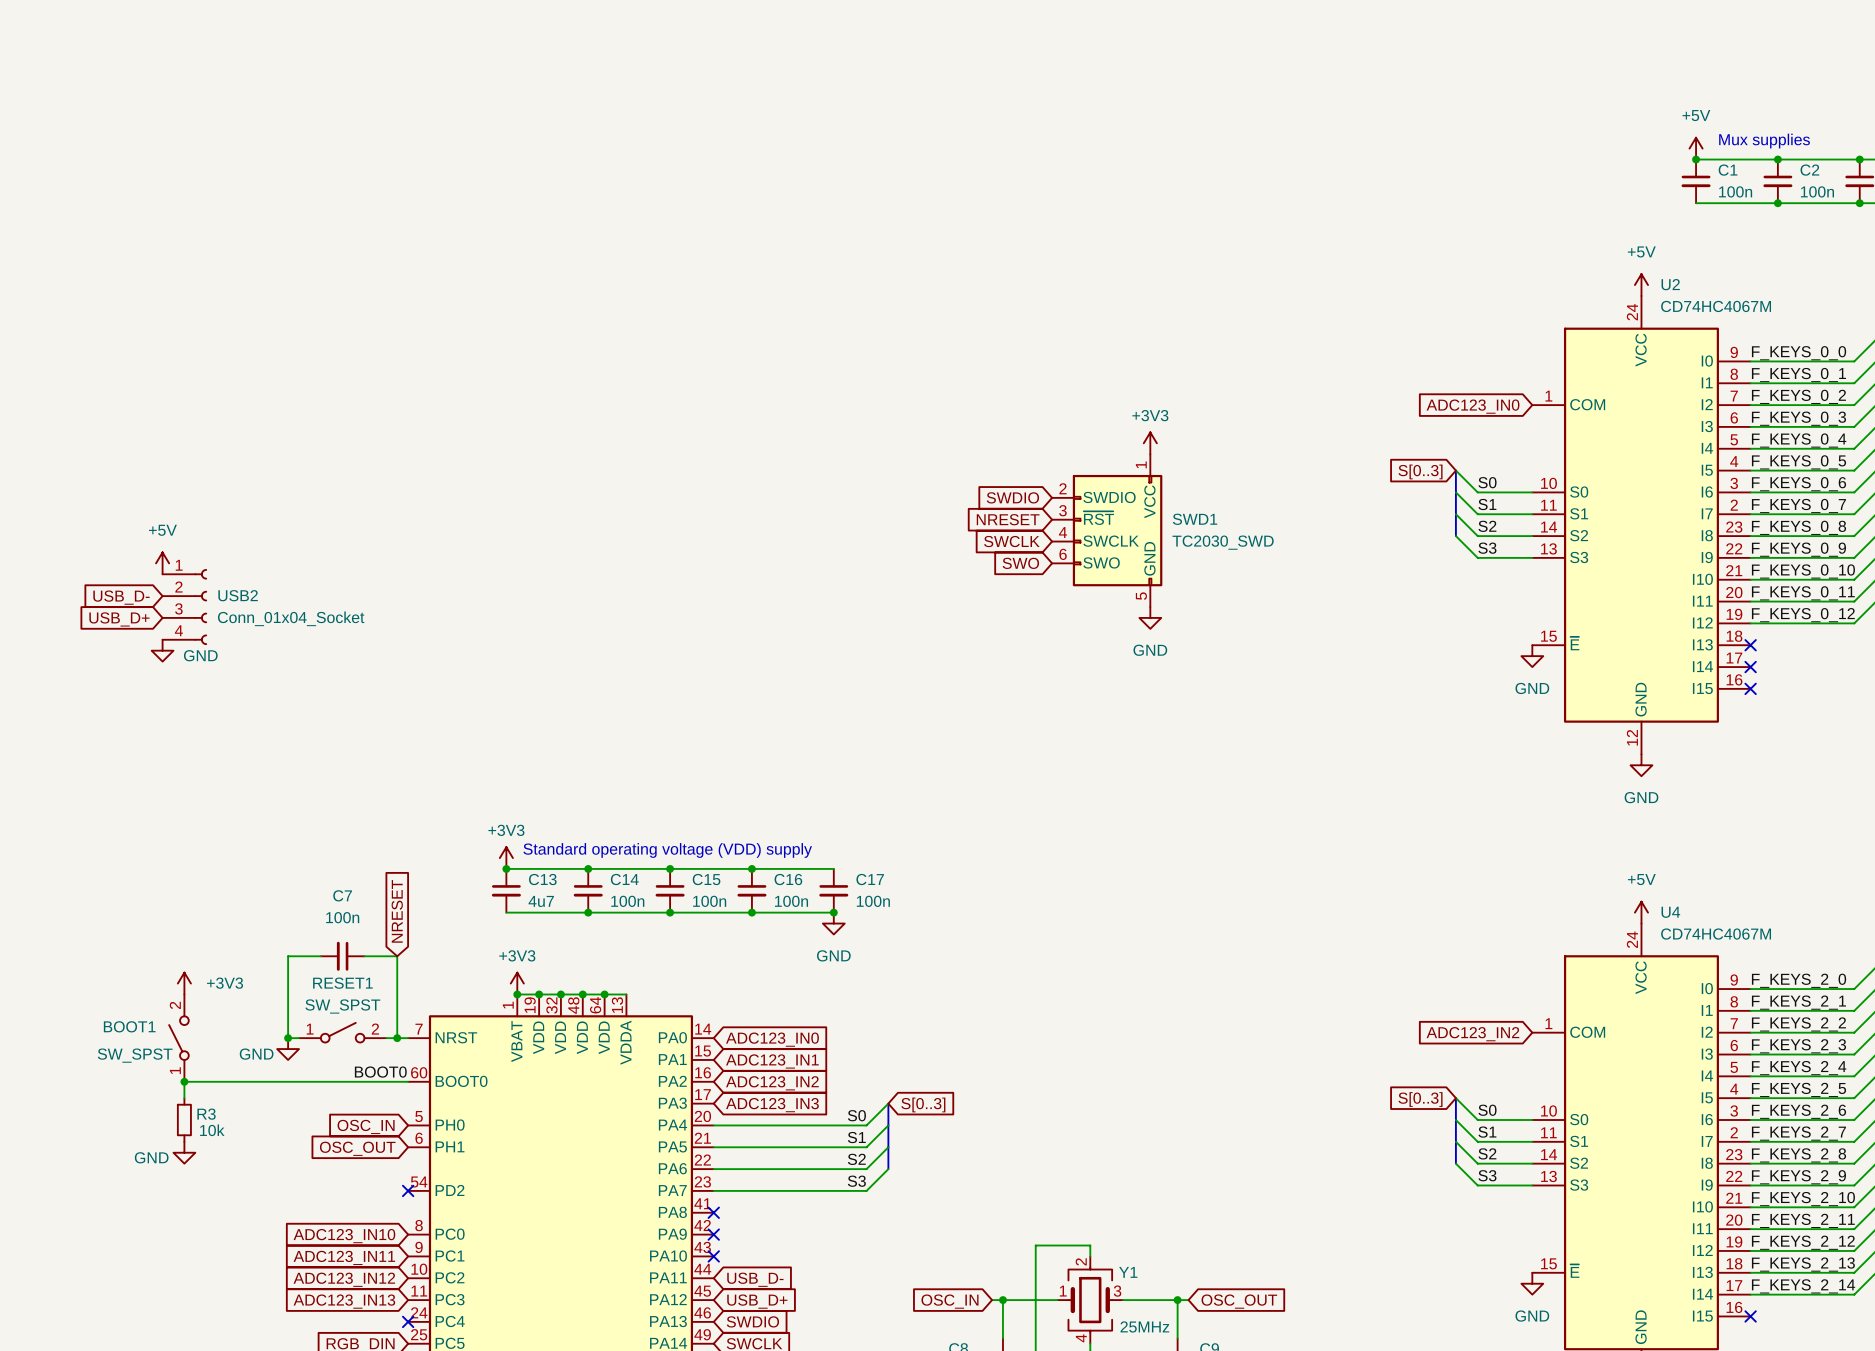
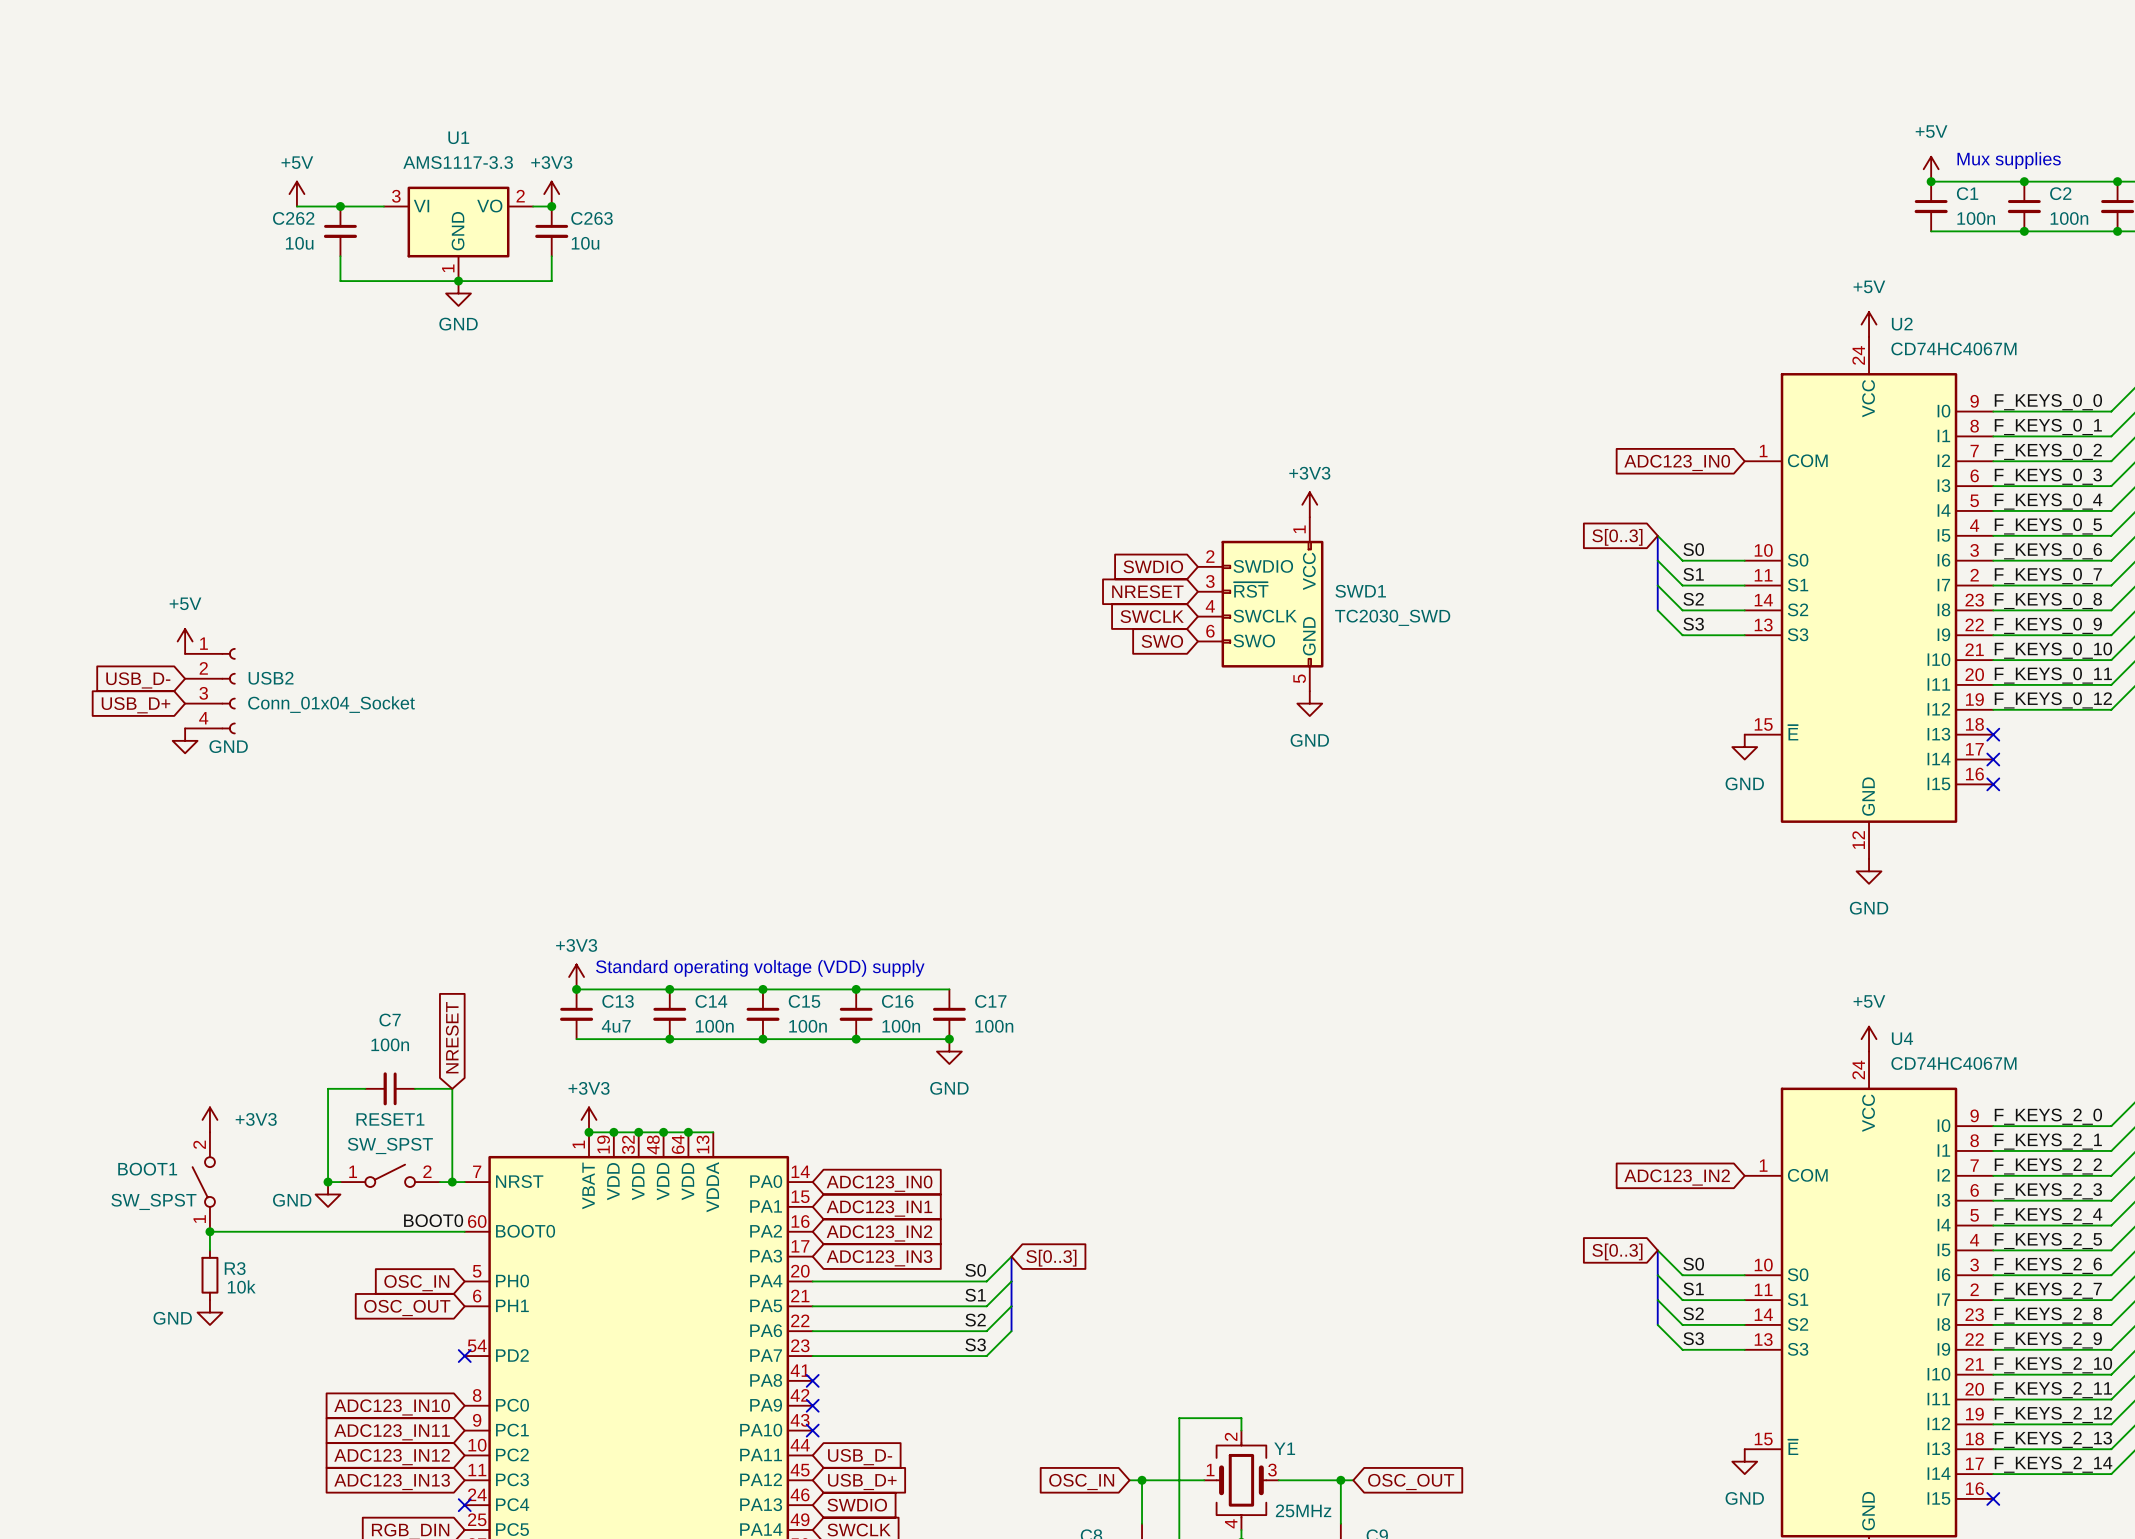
power symbol: none -> +5V (296, 194)
power symbol: none -> +3V3 (551, 194)
wire: none -> (296, 206) (383, 206)
junction: none -> (340, 206)
wire: none -> (533, 206) (551, 206)
junction: none -> (551, 206)
C262: none -> 10u (340, 231)
C263: none -> 10u (551, 231)
U1: none -> AMS1117-3.3 (458, 233)
wire: none -> (340, 256) (340, 281) (551, 281) (551, 256)
junction: none -> (458, 281)
power symbol: none -> GND (458, 293)

